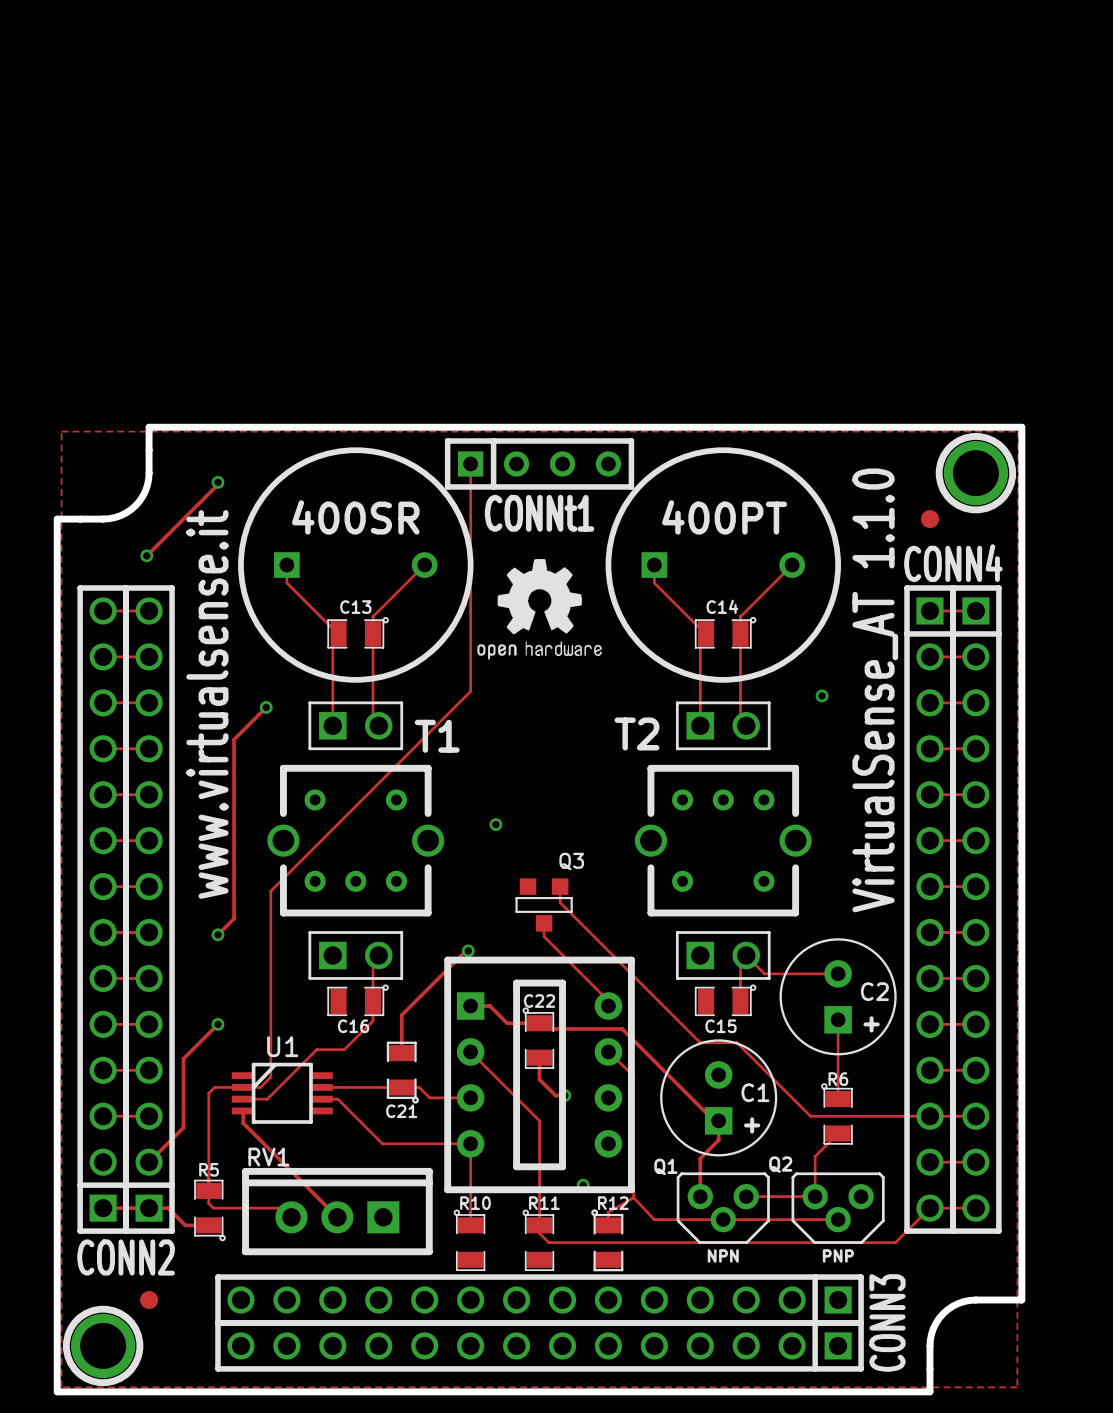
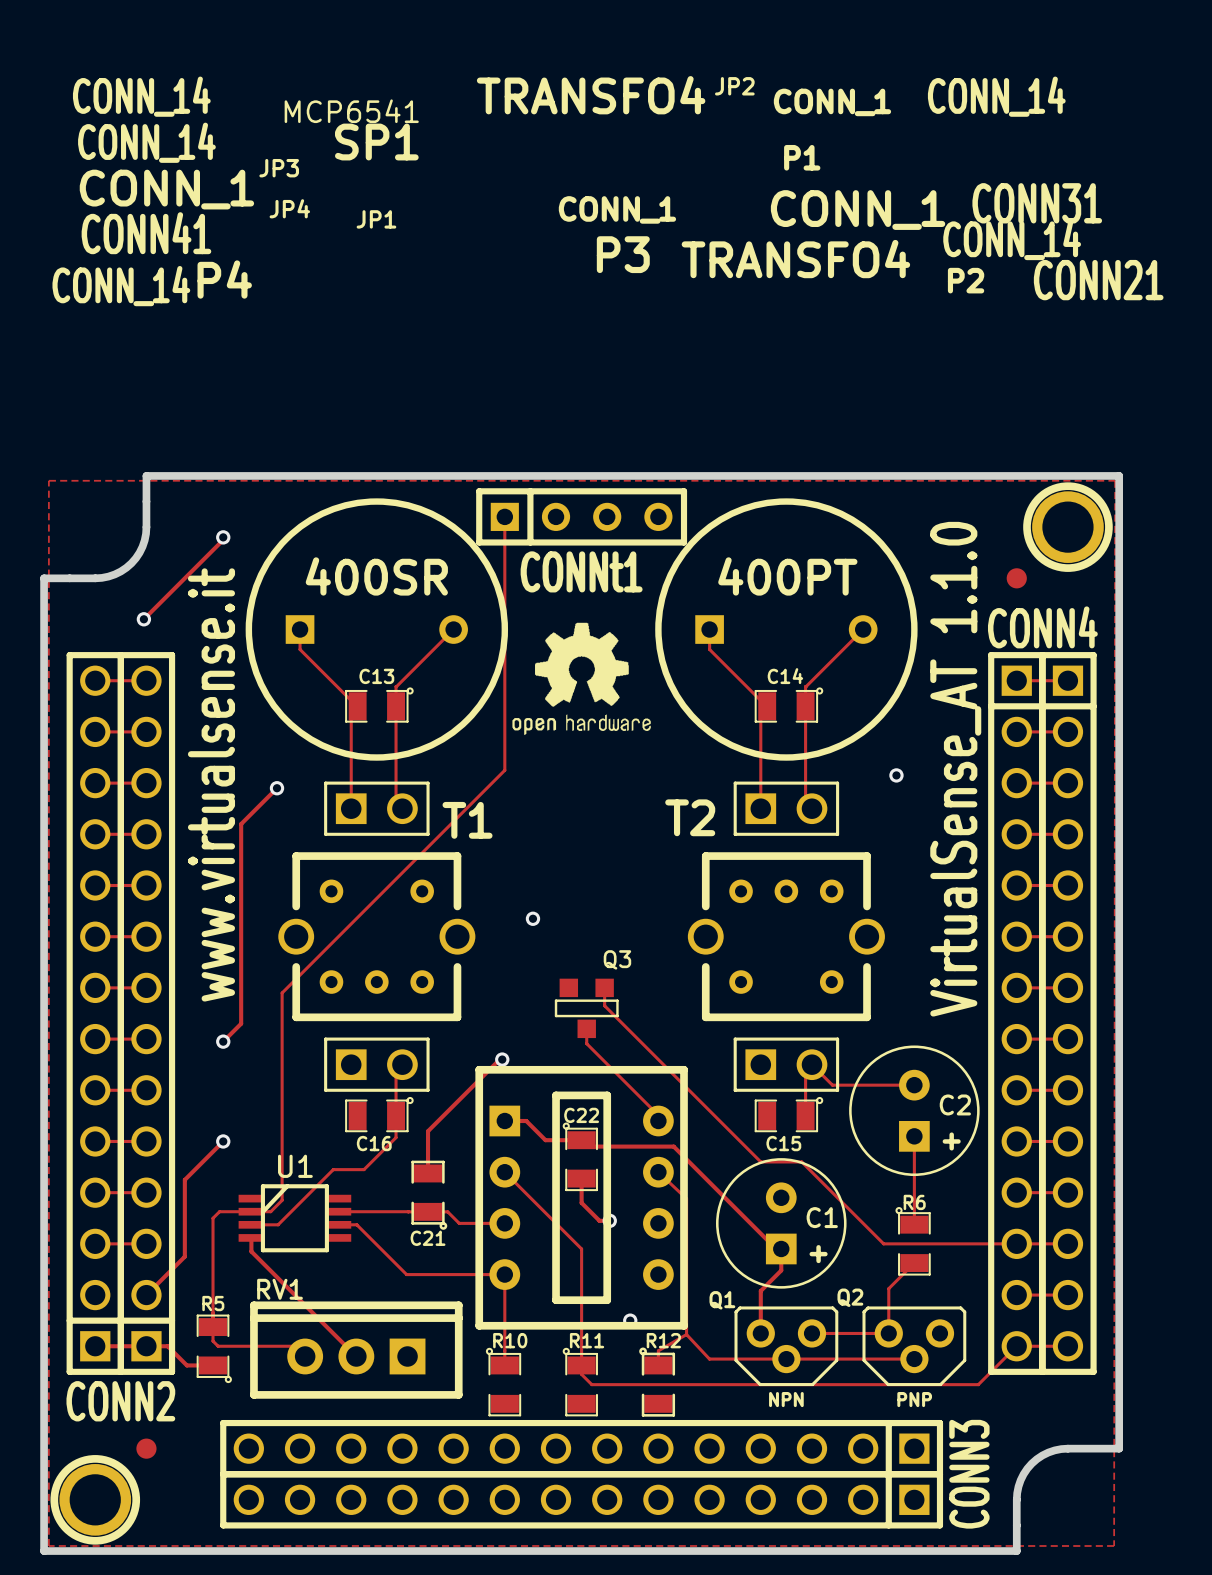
JP2 name: none -> JP2 (734, 86)
T1 value: none -> TRANSFO4 (591, 95)
CONN4 value: none -> CONN_14 (141, 96)
CONN3 value: none -> CONN_14 (996, 96)
P1 value: none -> CONN_1 (832, 102)
U1 value: none -> MCP6541 (351, 111)
SP1 name: none -> SP1 (376, 142)
CONN41 value: none -> CONN_14 (146, 142)
P1 name: none -> P1 (802, 157)
JP3 name: none -> JP3 (279, 168)
P4 value: none -> CONN_1 (166, 189)
CONN31 name: none -> CONN31 (1037, 203)
JP4 name: none -> JP4 (289, 208)
P2 value: none -> CONN_1 (617, 209)
P3 value: none -> CONN_1 (858, 210)
JP1 name: none -> JP1 (376, 219)
CONN41 name: none -> CONN41 (146, 233)
CONN31 value: none -> CONN_14 (1012, 240)
P3 name: none -> P3 (623, 254)
T2 value: none -> TRANSFO4 (795, 259)
P4 name: none -> P4 (224, 279)
P2 name: none -> P2 (966, 280)
CONN21 name: none -> CONN21 (1098, 280)
CONN2 value: none -> CONN_14 (121, 286)

